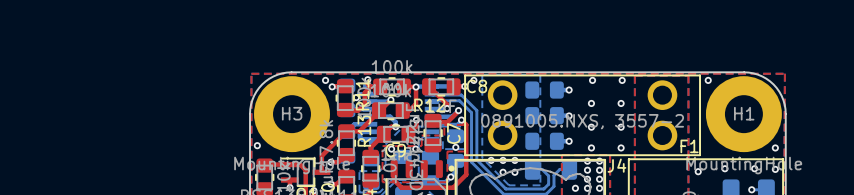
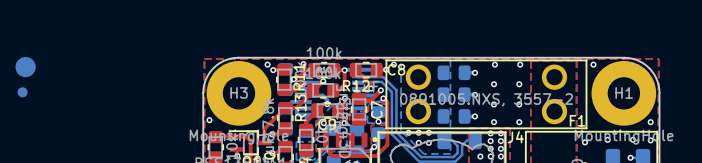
part: none -> (25, 67)
part: none -> (22, 92)

